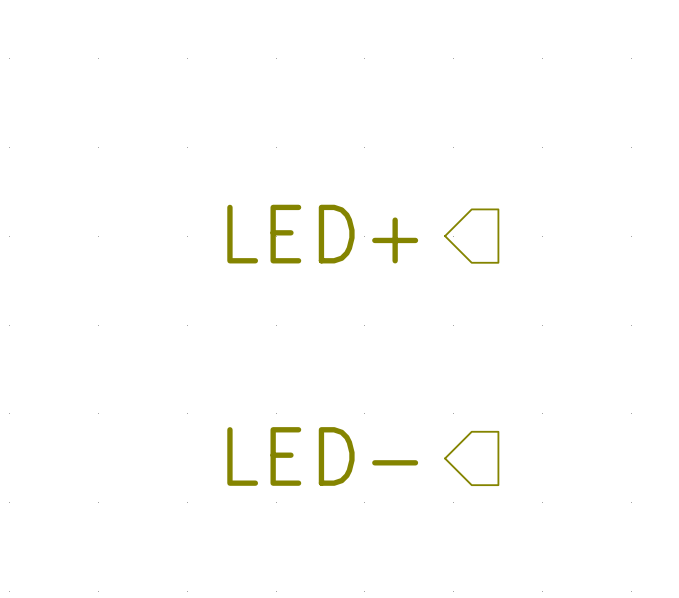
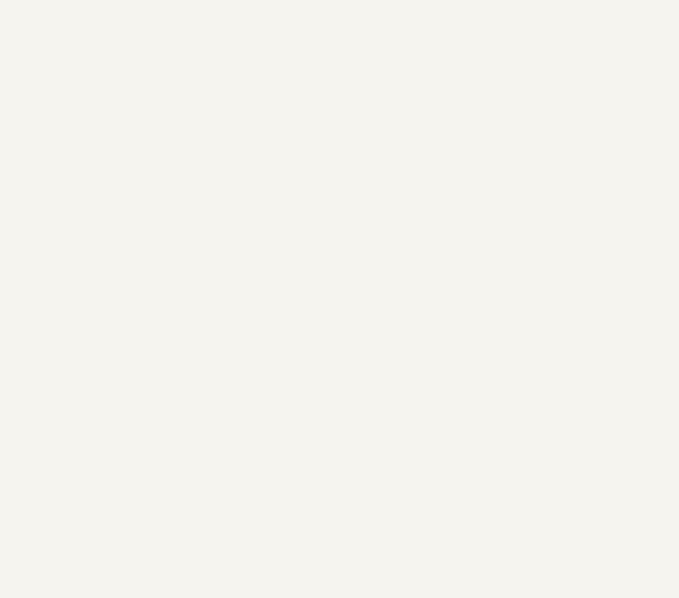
hierarchical label: LED+ (322, 234) -> none
hierarchical label: LED- (322, 456) -> none

